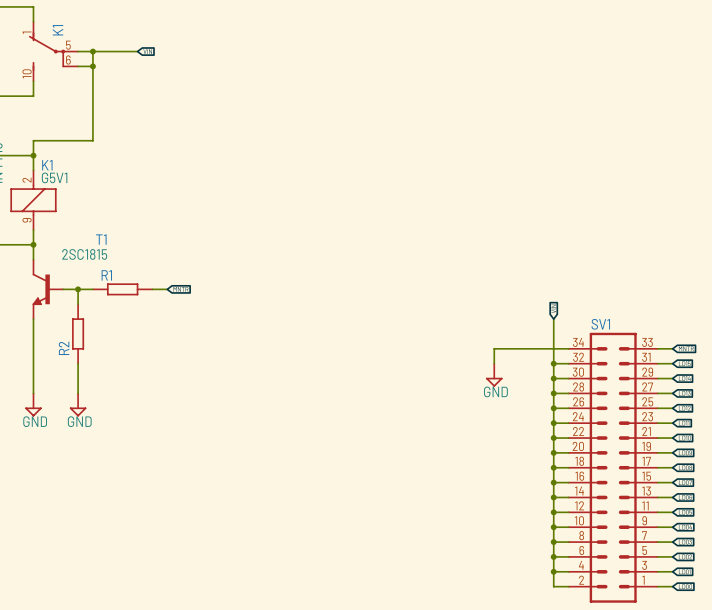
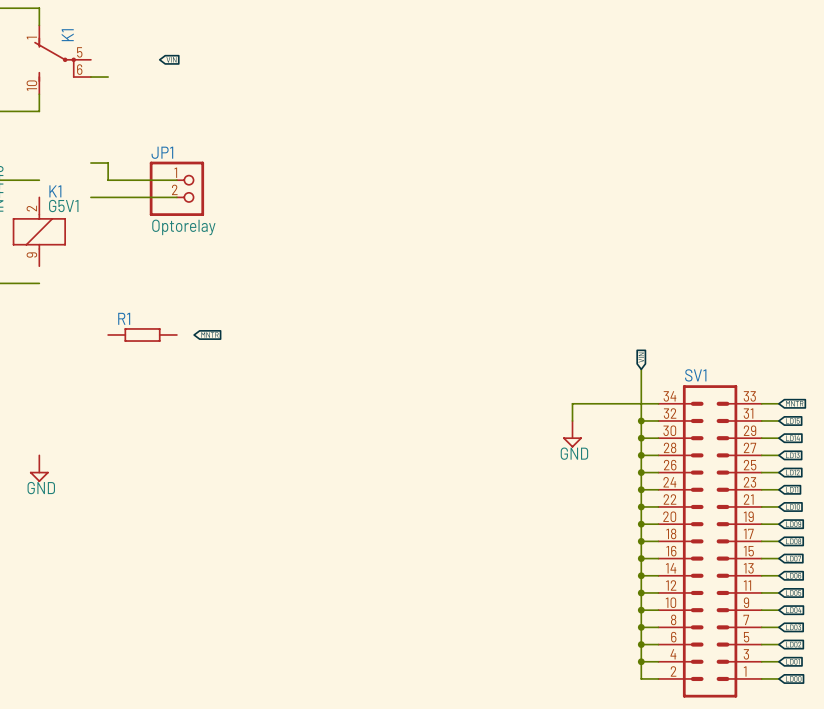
wire: (78, 51) (137, 51) -> none
wire: (92, 51) (92, 140) -> (176, 180) (108, 180) (108, 163)
junction: (92, 51) -> none
junction: (92, 66) -> none
wire: (78, 140) (33, 140) (33, 170) -> none
junction: (33, 155) -> none
JP1: none -> Optorelay (176, 188)
wire: none -> (90, 197) (176, 197)
wire: (33, 229) (33, 259) -> none
junction: (33, 244) -> none
T1: 2SC1815 (48, 289) -> none
wire: (63, 289) (92, 289) -> none
wire: (78, 289) (78, 304) -> none
junction: (78, 289) -> none
wire: (152, 289) (167, 289) -> none
wire: (33, 319) (33, 393) -> none
R2: (78, 333) -> none
wire: (78, 363) (78, 393) -> none
power symbol: GND (78, 404) -> none

